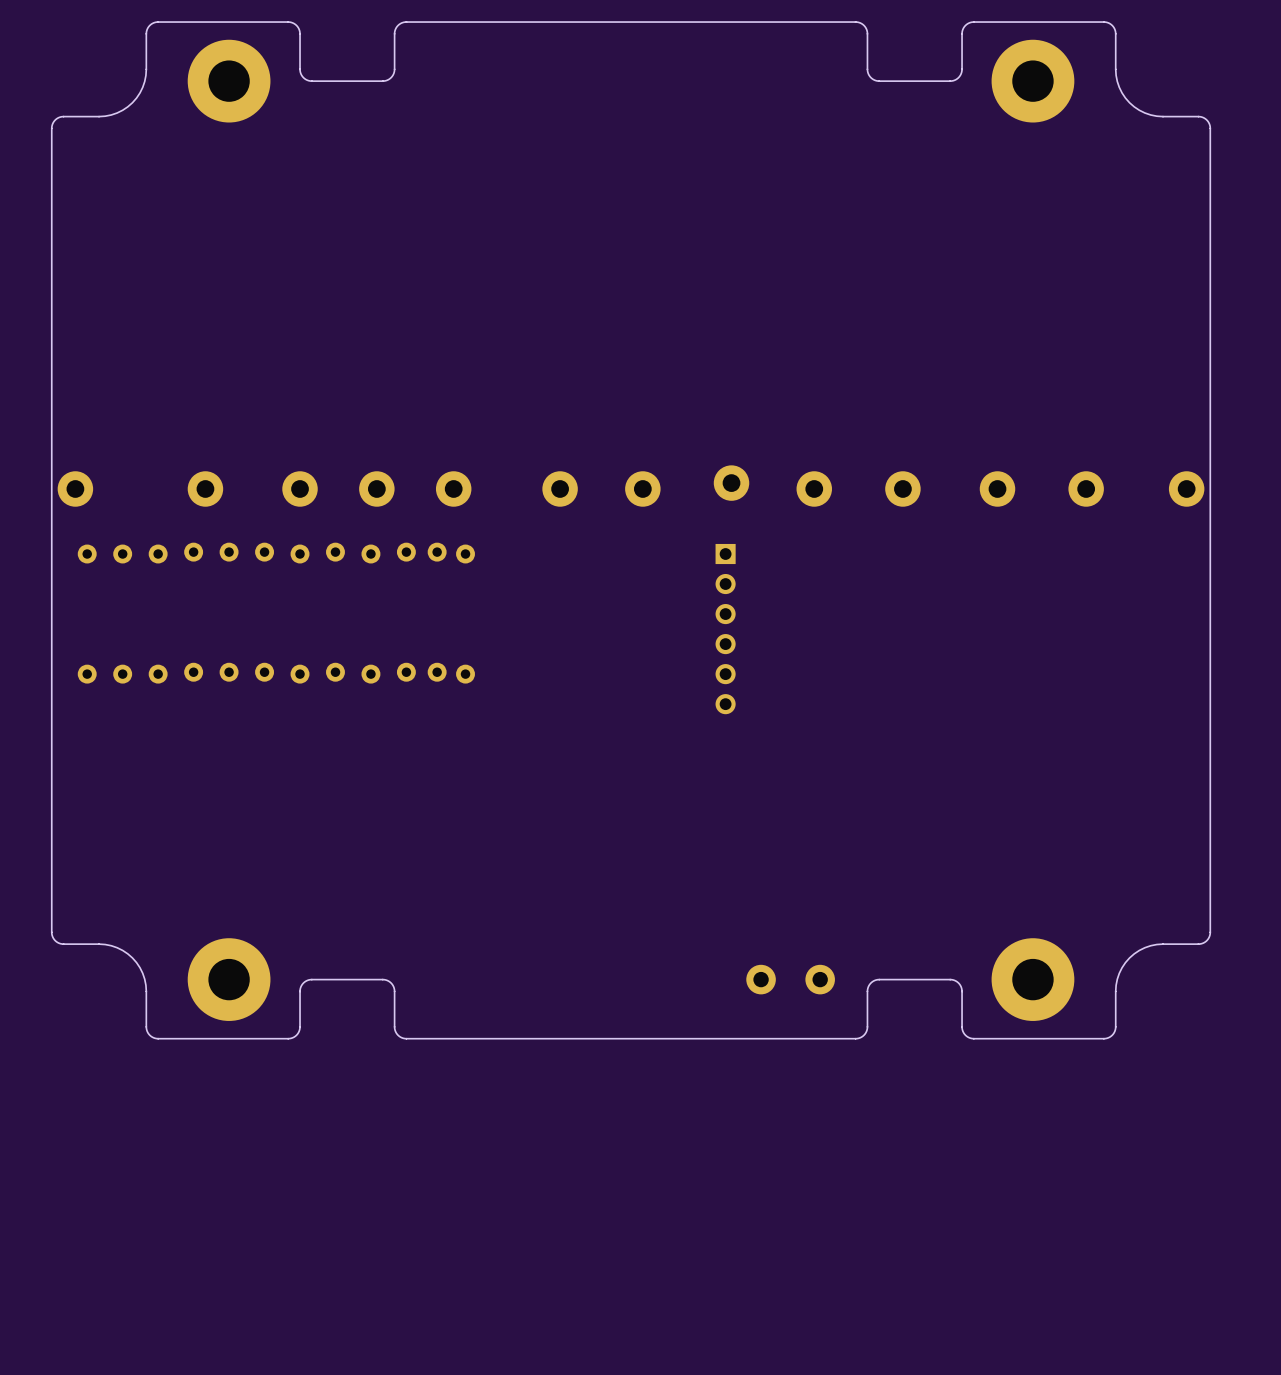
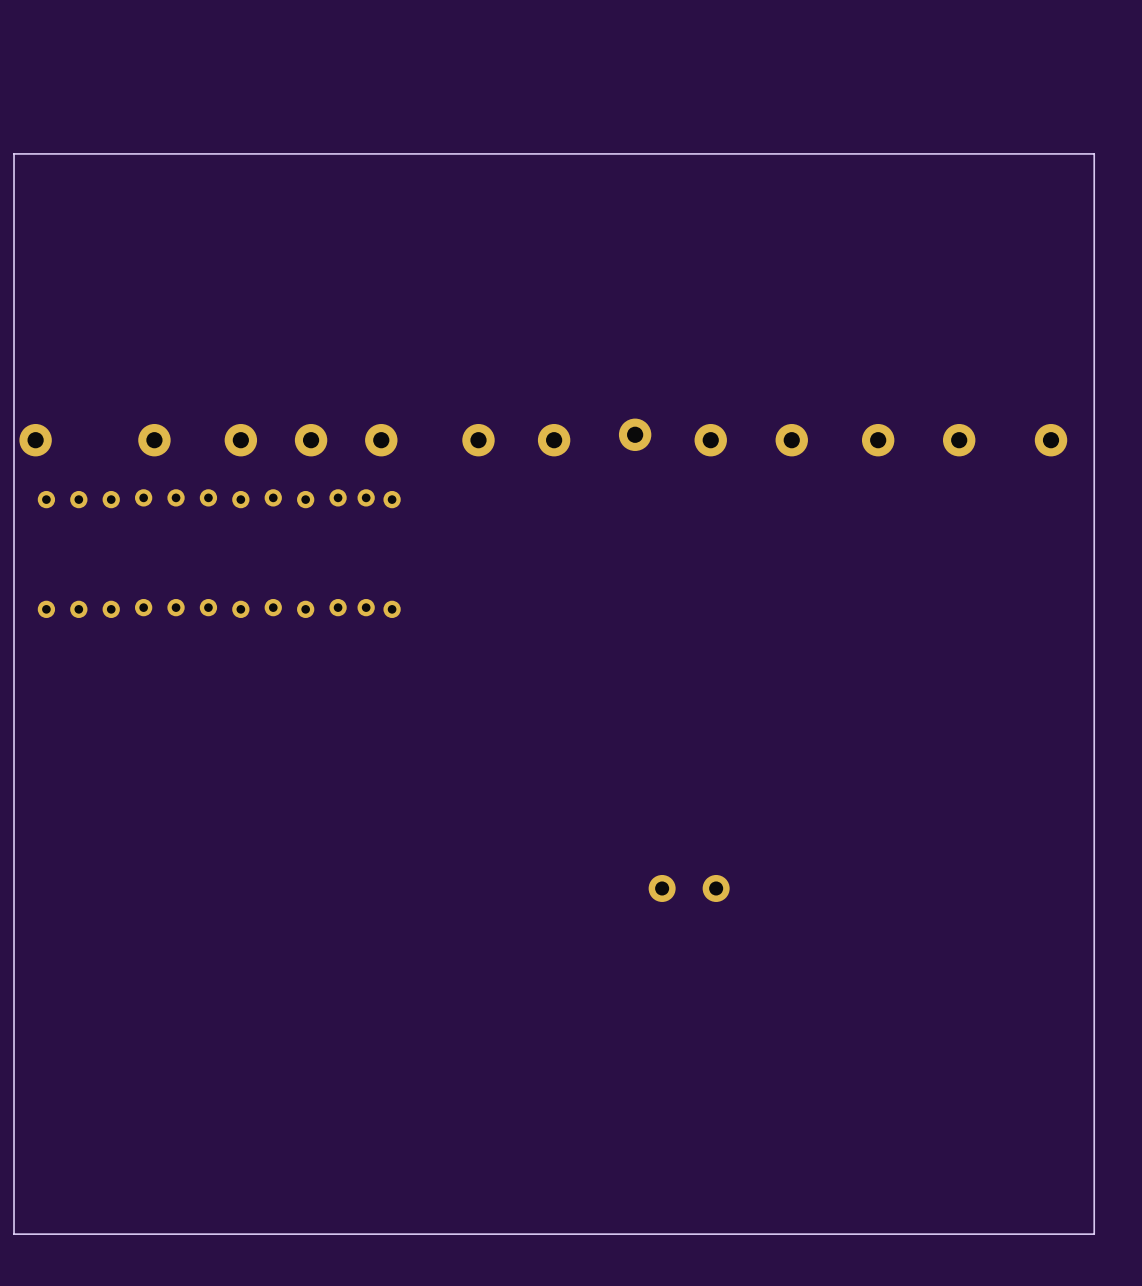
part: (229, 81) -> none
part: (1032, 81) -> none
board edge: (51, 175) (51, 128) (54, 121) (62, 116) (111, 114) (122, 110) (132, 102) (139, 92) (145, 75) (146, 30) (150, 24) (158, 22) (292, 22) (297, 26) (299, 32) (300, 72) (304, 78) (311, 81) (388, 79) (394, 70) (394, 30) (399, 24) (404, 22) (857, 22) (862, 24) (867, 30) (868, 73) (872, 78) (879, 81) (956, 79) (961, 70) (962, 30) (965, 25) (970, 22) (1105, 22) (1111, 24) (1115, 30) (1116, 75) (1122, 92) (1129, 102) (1139, 110) (1156, 116) (1201, 117) (1207, 121) (1210, 128) (1210, 933) (1207, 939) (1201, 943) (1156, 944) (1139, 950) (1129, 957) (1122, 967) (1117, 979) (1115, 1028) (1111, 1036) (1103, 1038) (970, 1038) (965, 1035) (962, 1029) (961, 989) (956, 981) (879, 979) (872, 982) (868, 986) (867, 1029) (862, 1036) (857, 1038) (404, 1038) (399, 1036) (394, 1029) (394, 989) (388, 981) (311, 979) (304, 982) (300, 988) (299, 1028) (297, 1034) (292, 1037) (156, 1038) (150, 1036) (146, 1029) (145, 985) (139, 967) (132, 957) (122, 950) (105, 944) (60, 943) (54, 939) (51, 932) -> (14, 153) (1094, 153) (1094, 1234) (14, 1234) (14, 845)
part: (725, 629) -> none
part: (229, 979) -> none
part: (1032, 979) -> none

